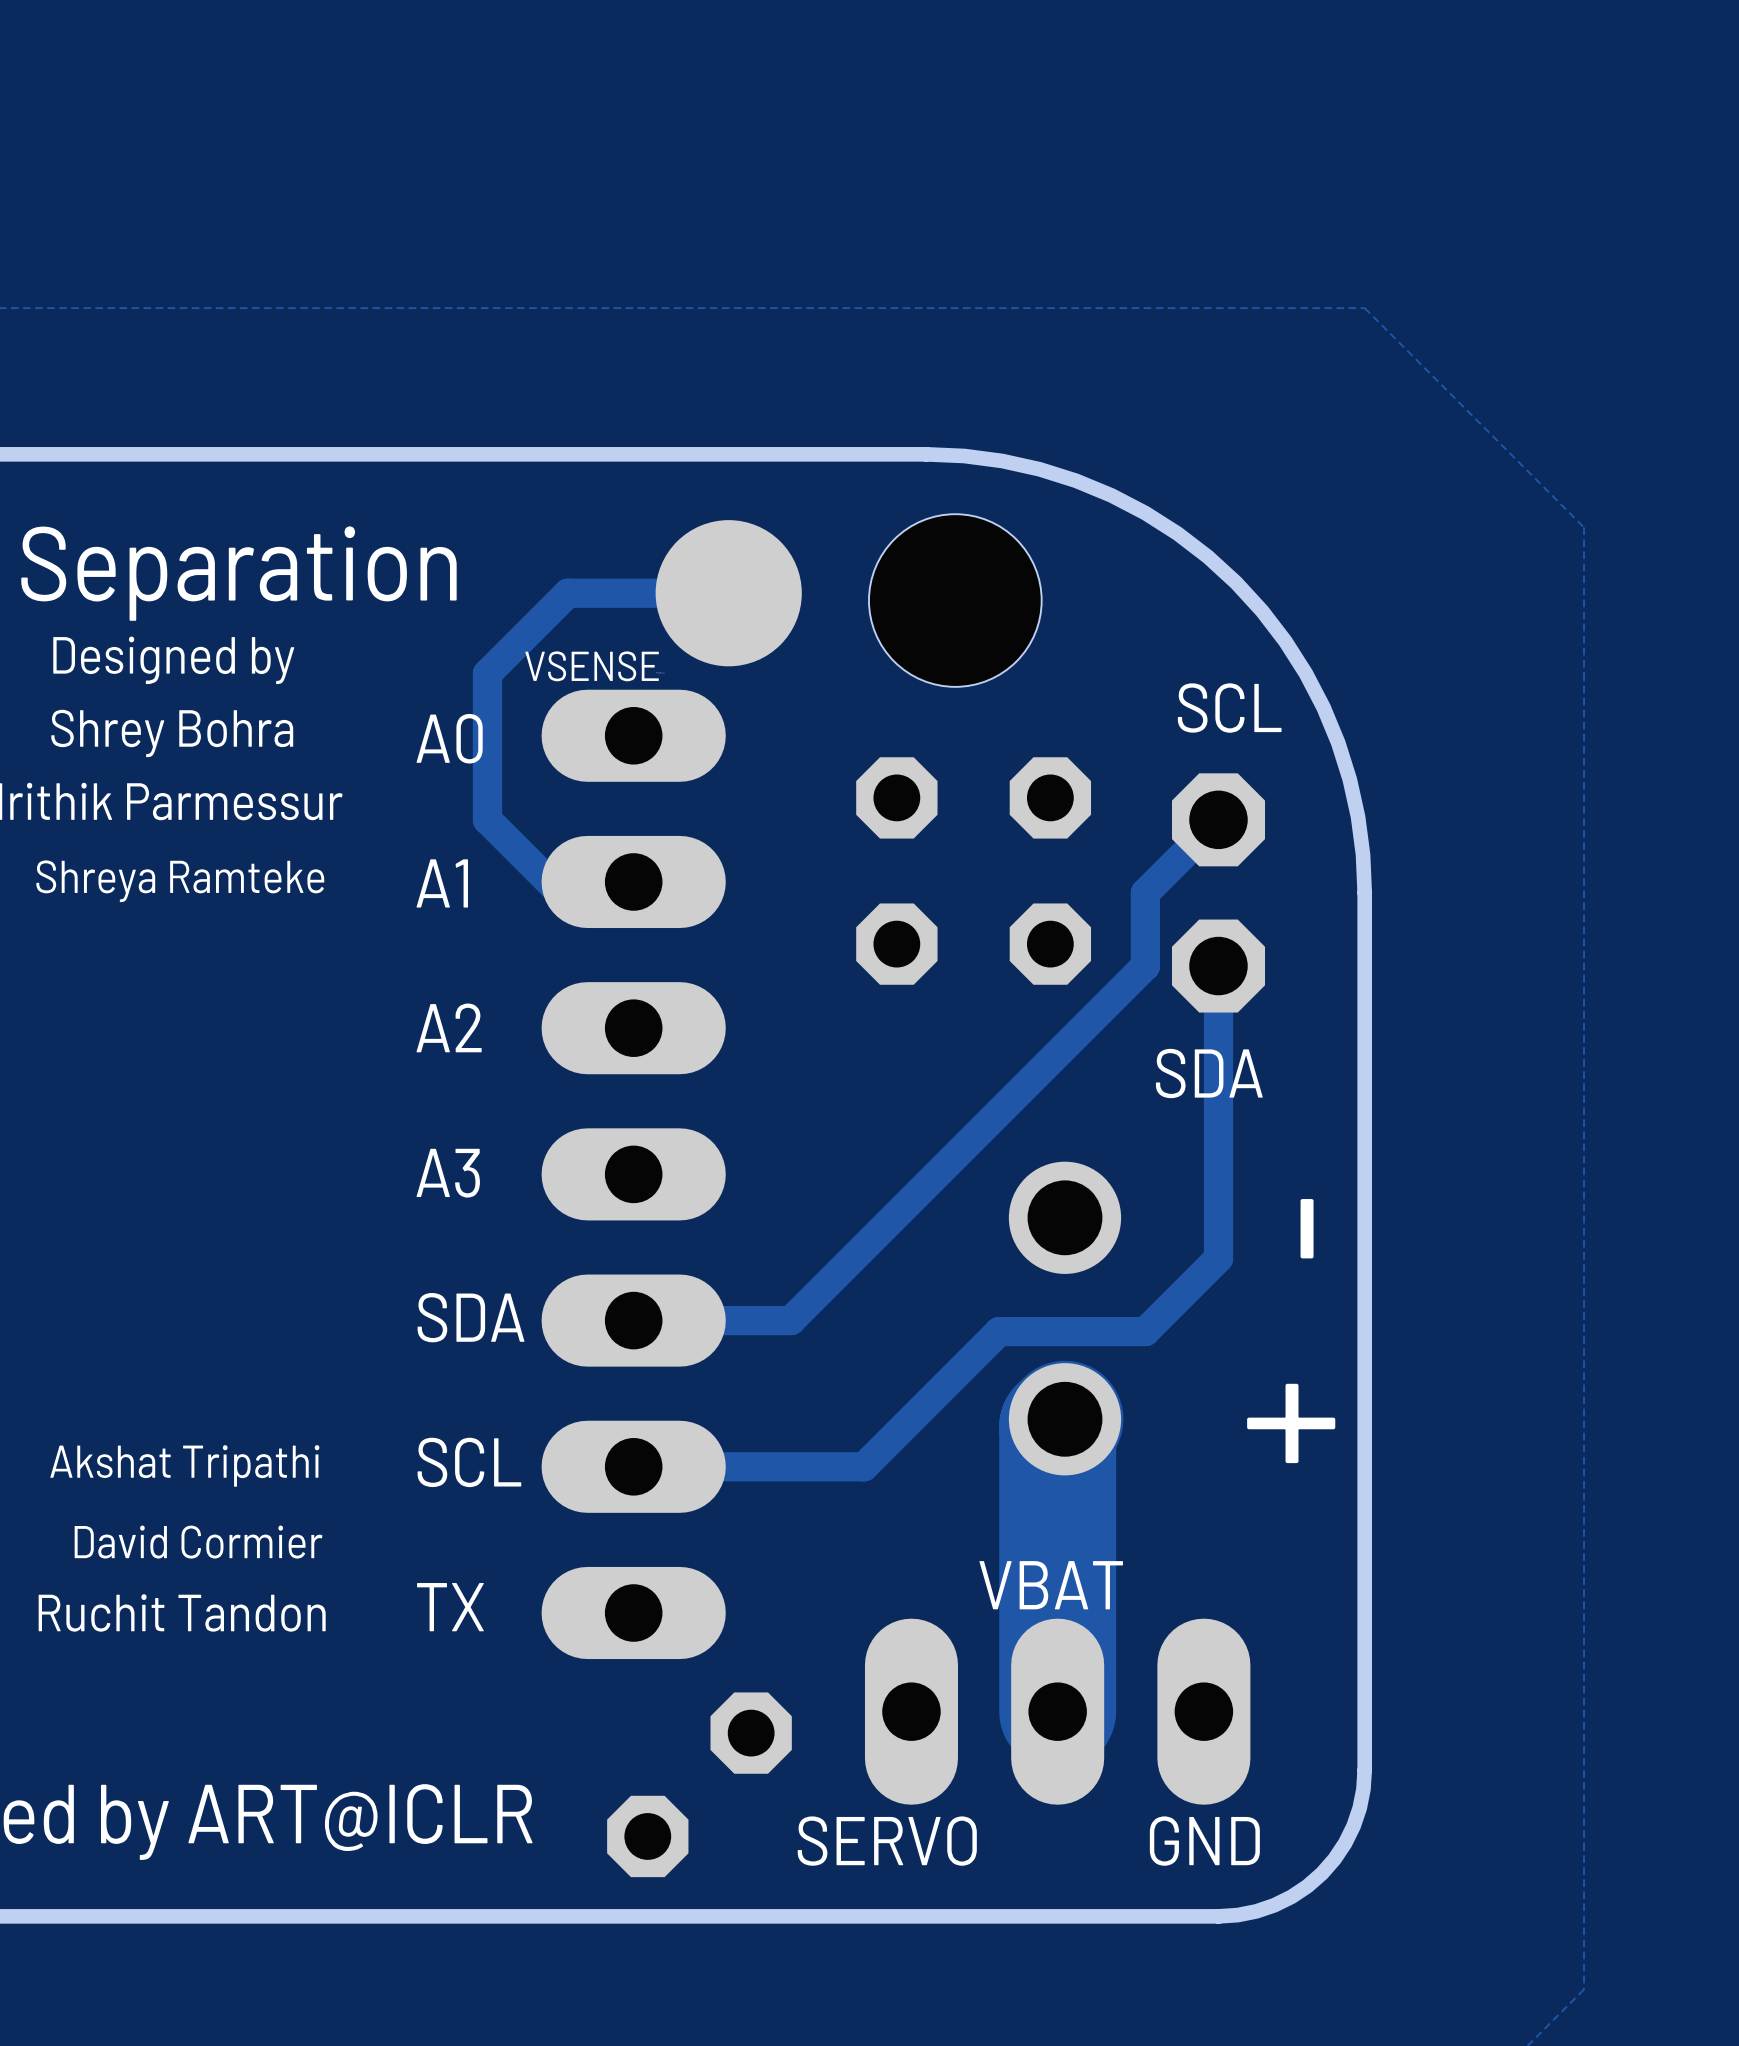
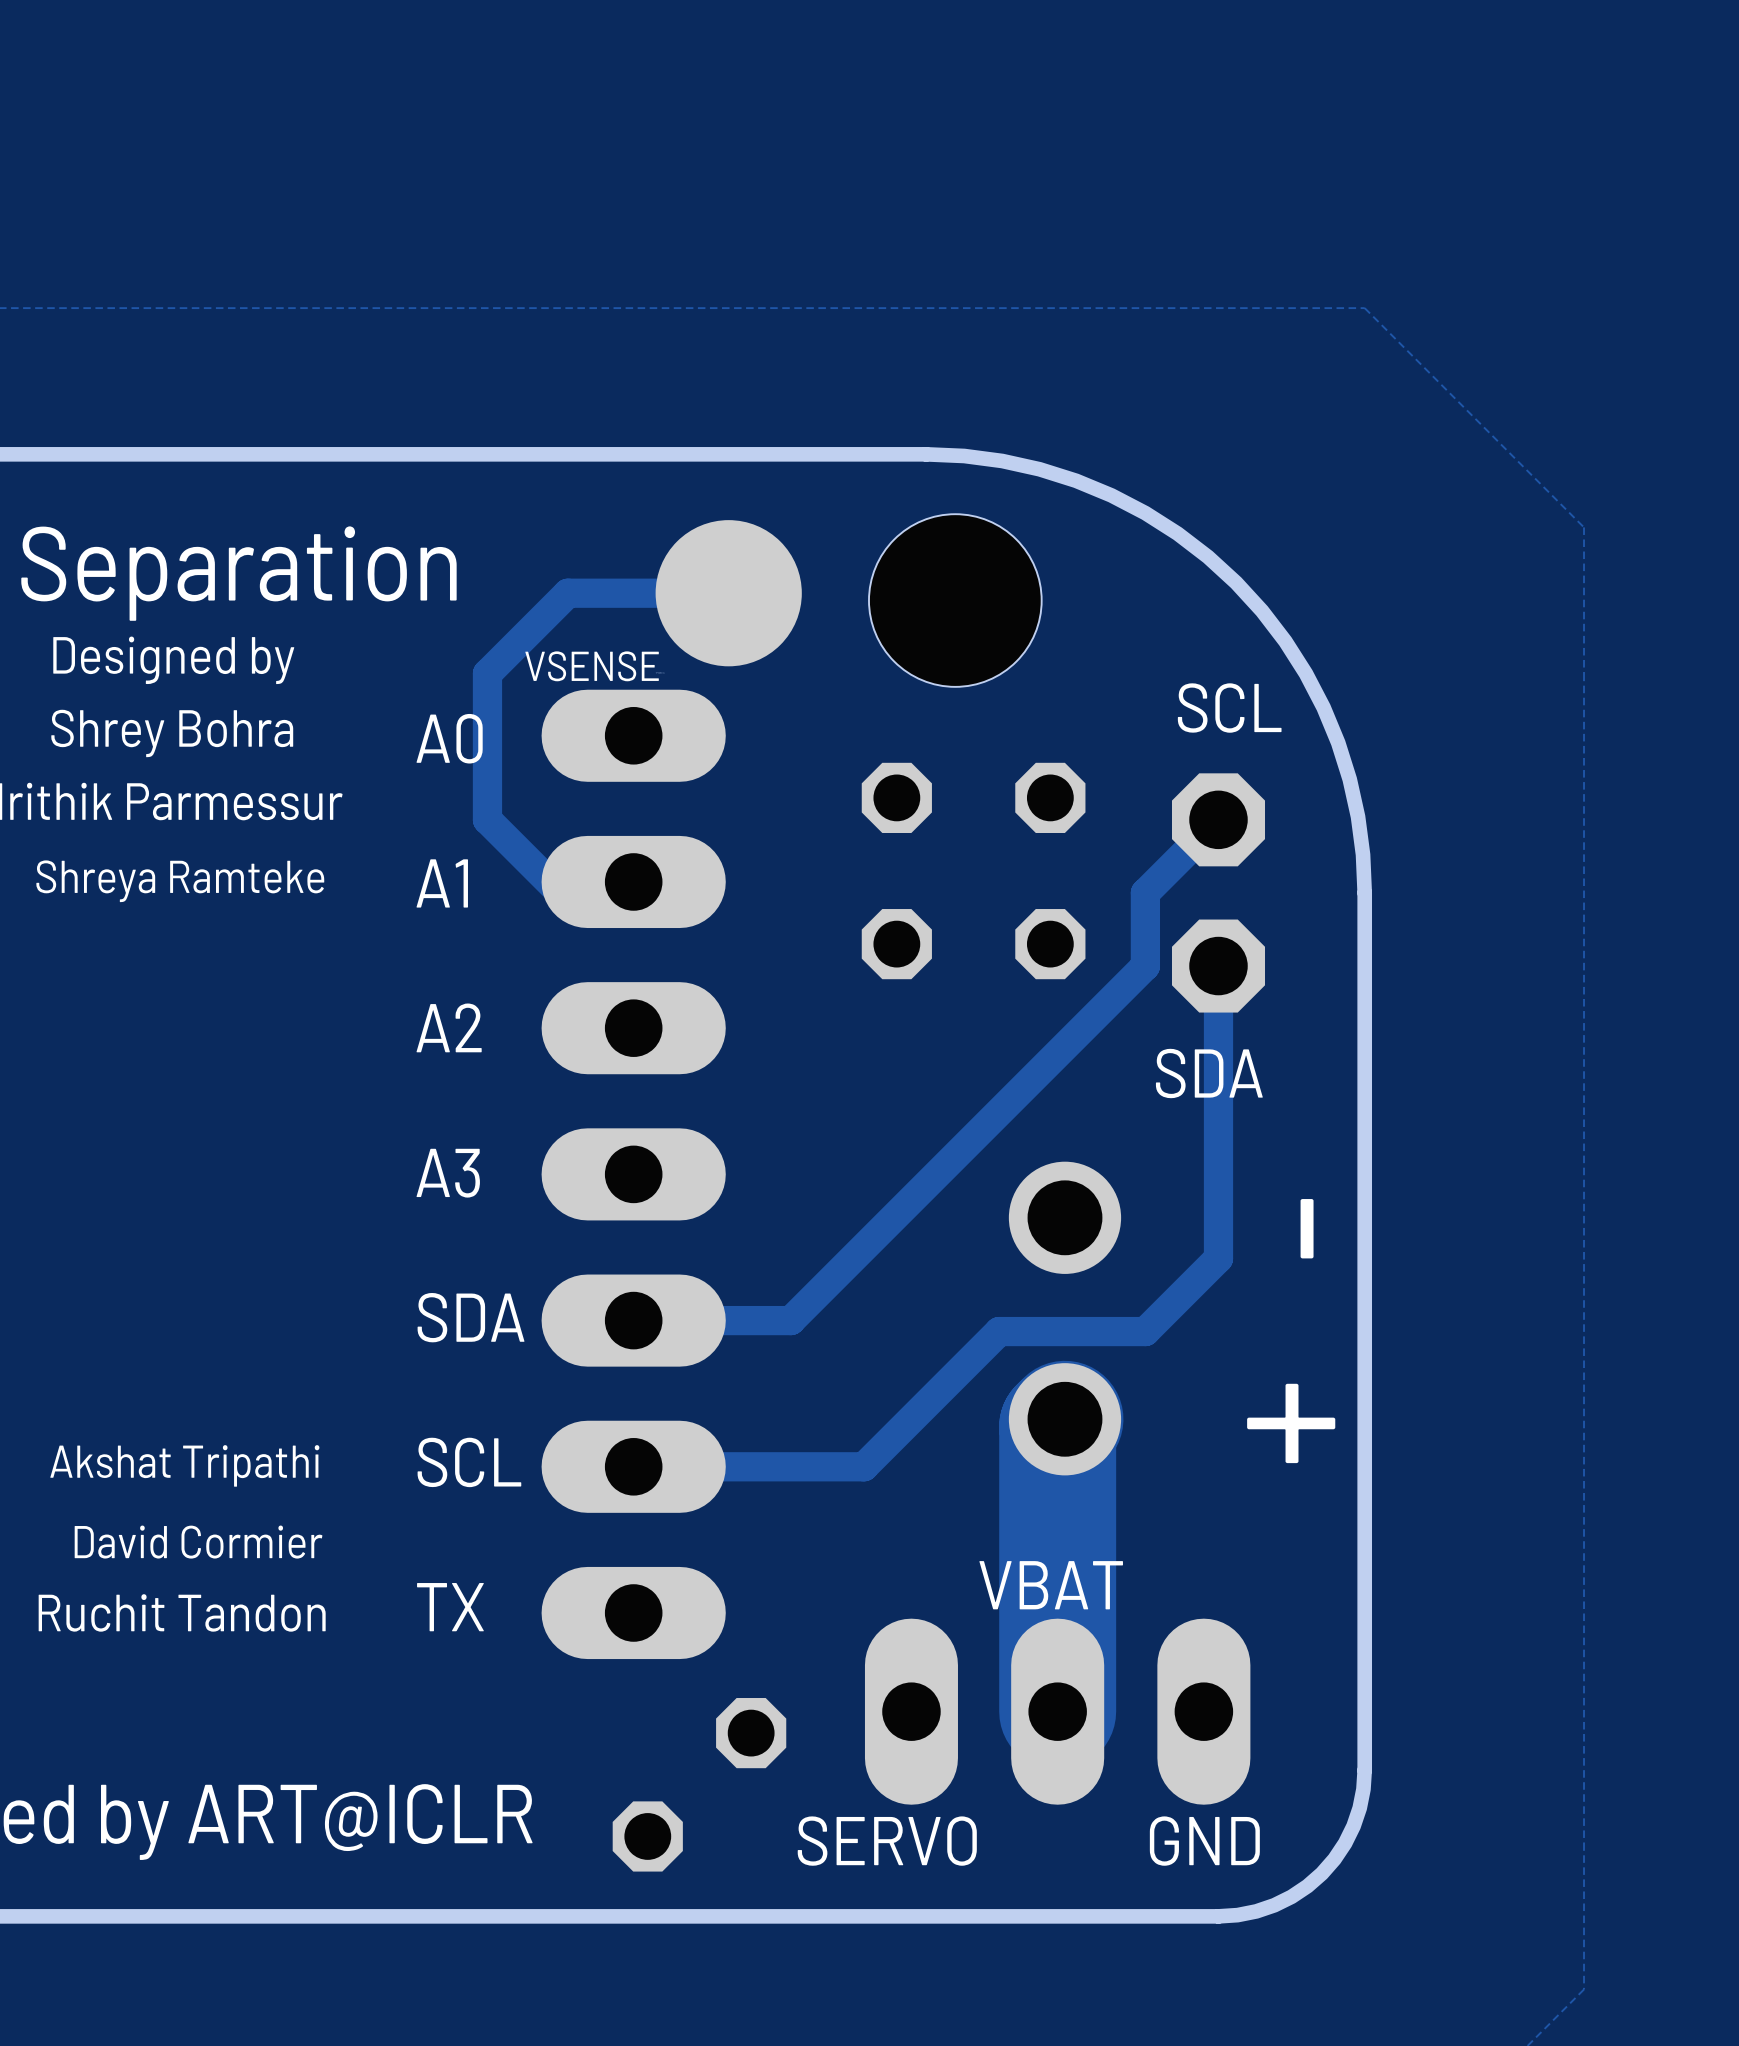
part footprint: [856, 757, 938, 985] -> [861, 762, 932, 980]
part footprint: [1009, 757, 1092, 985] -> [1015, 762, 1086, 980]
part footprint: [607, 1692, 792, 1878] -> [612, 1698, 787, 1872]

